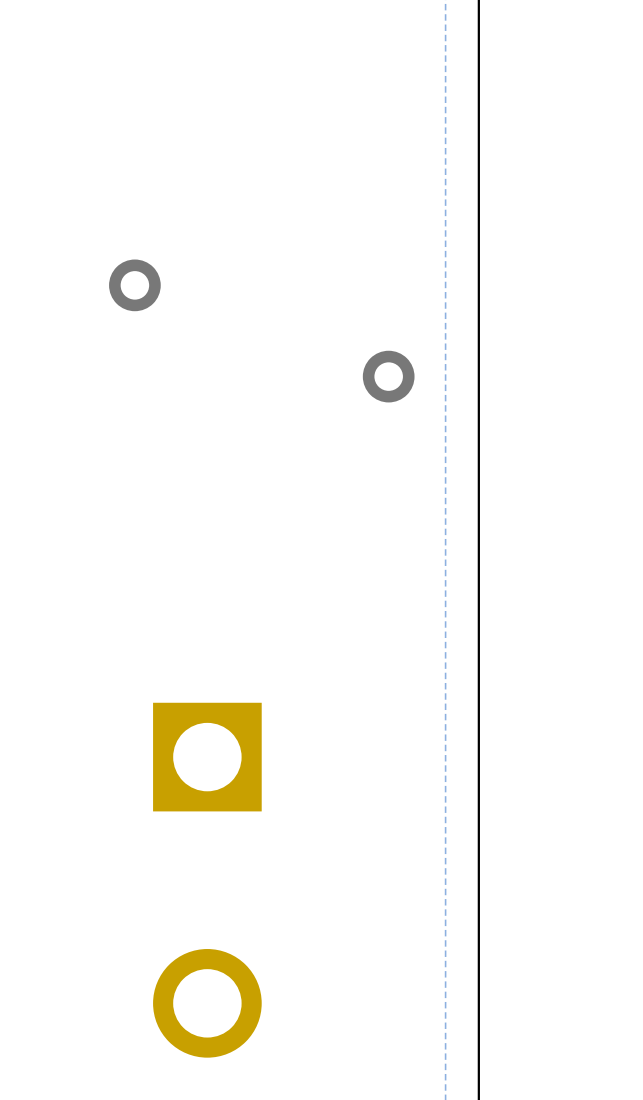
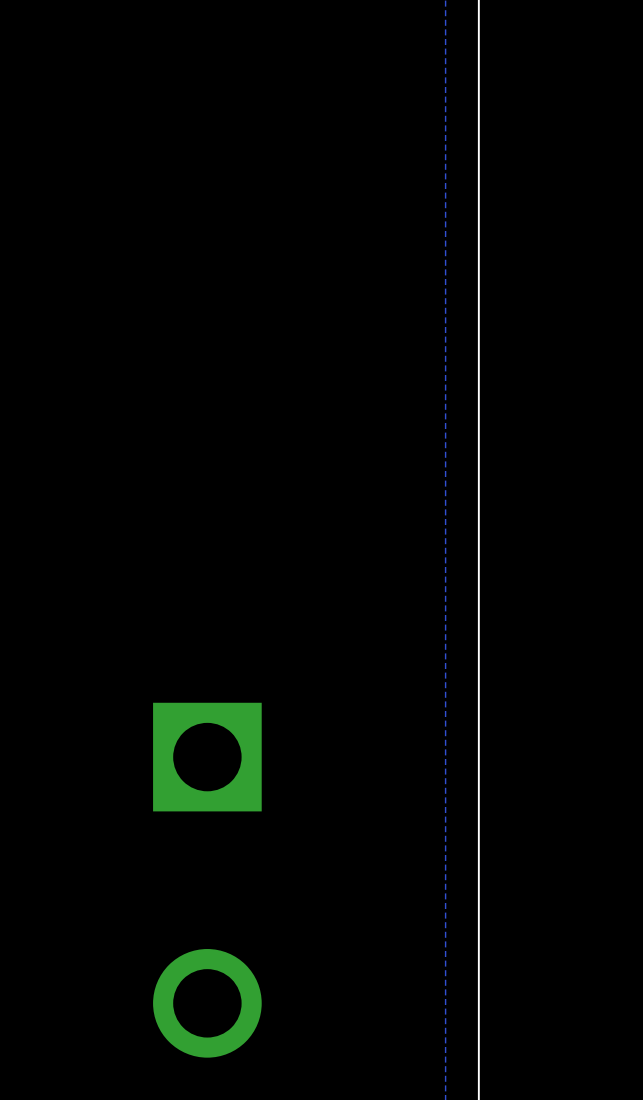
via: (134, 285) -> none
via: (388, 376) -> none

